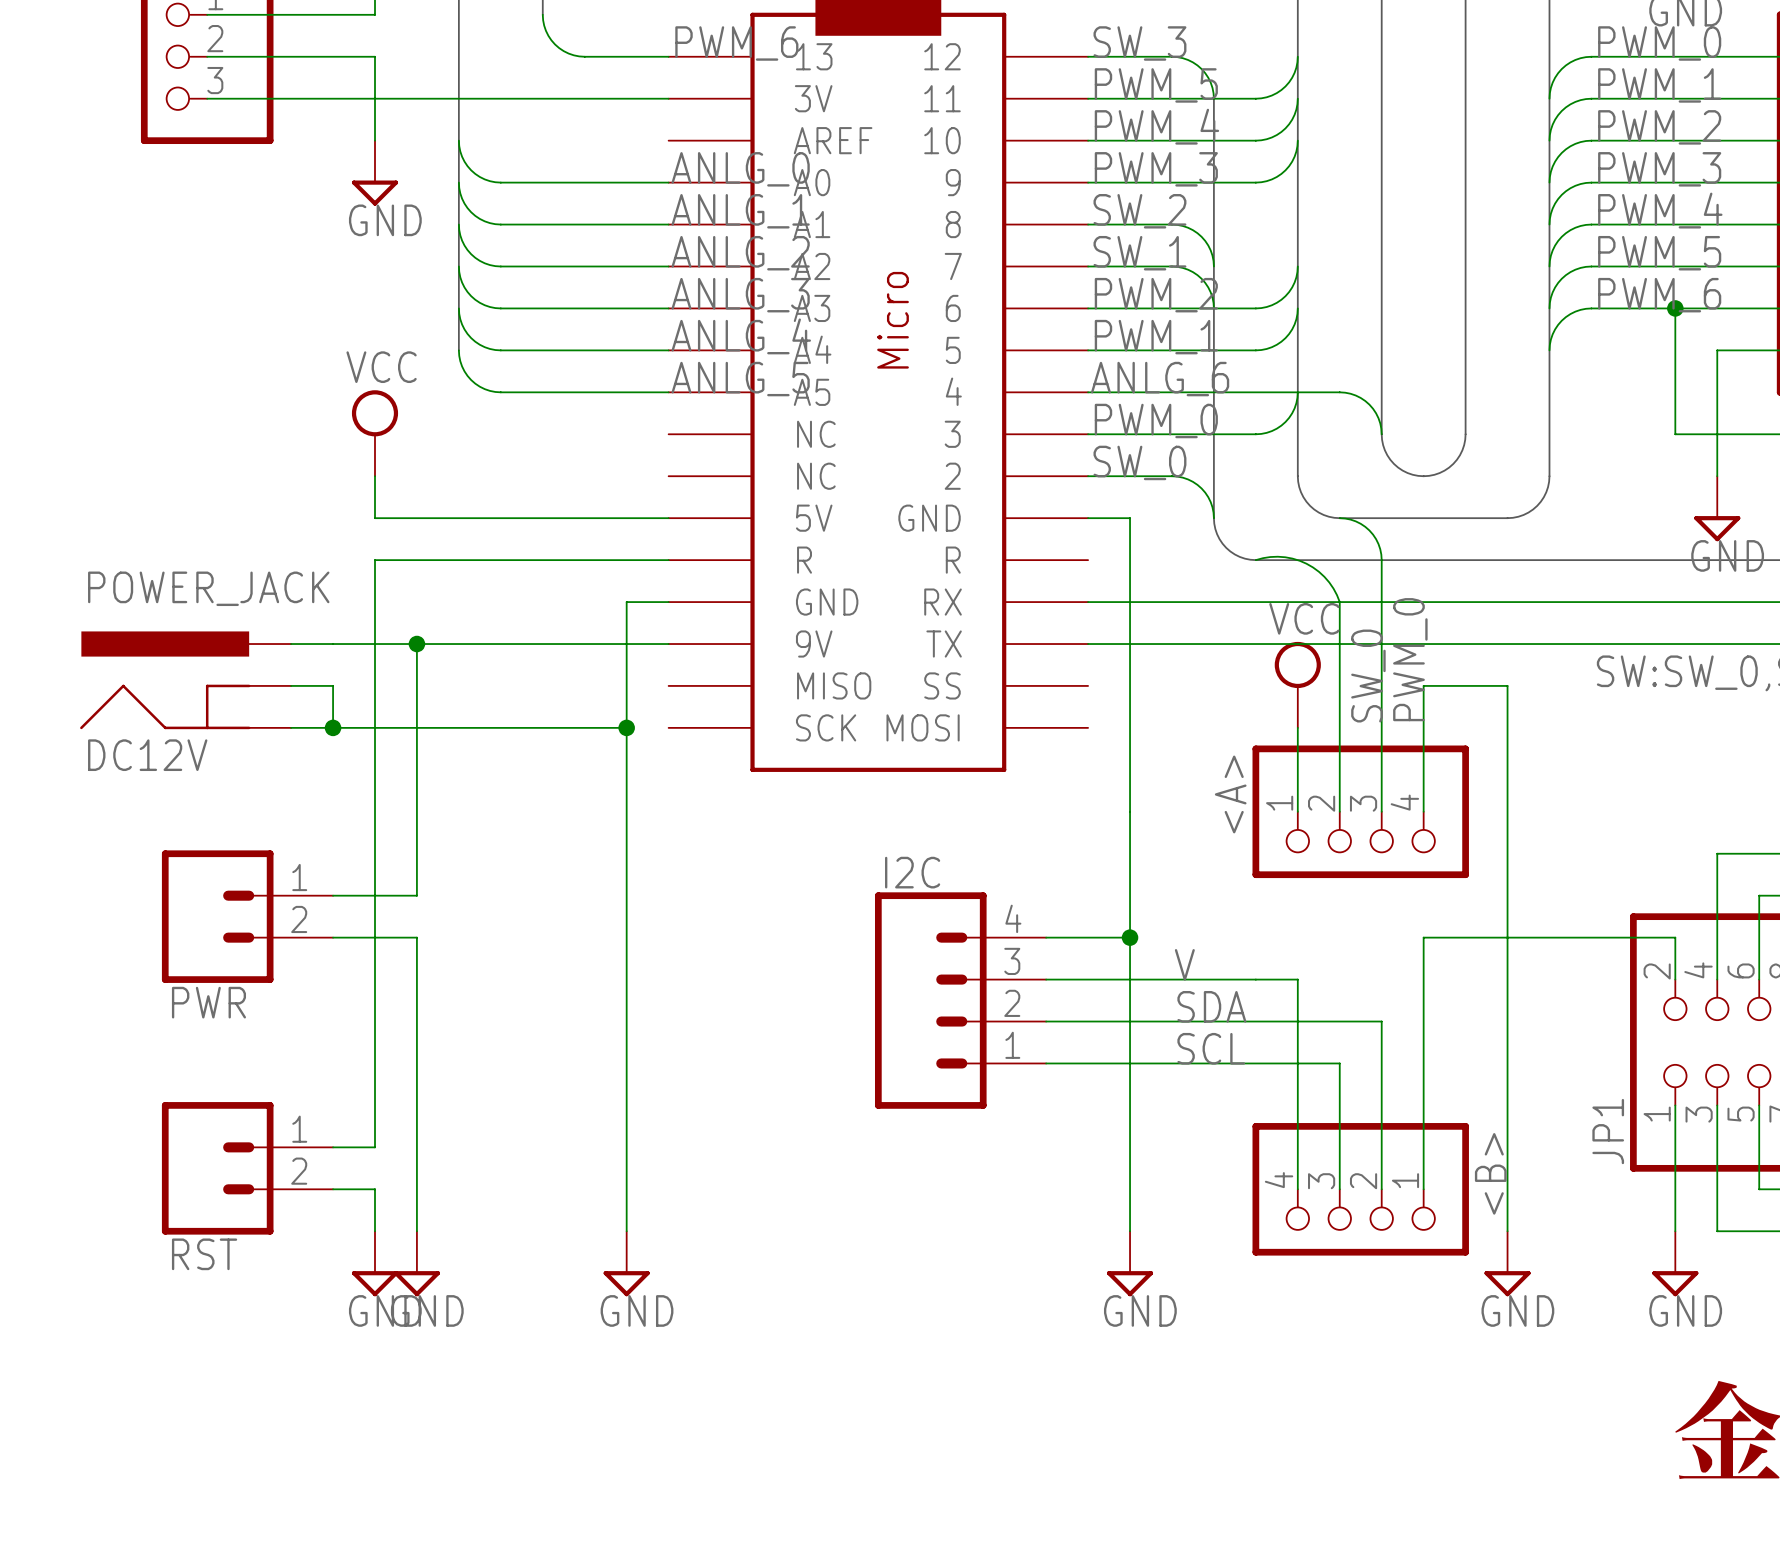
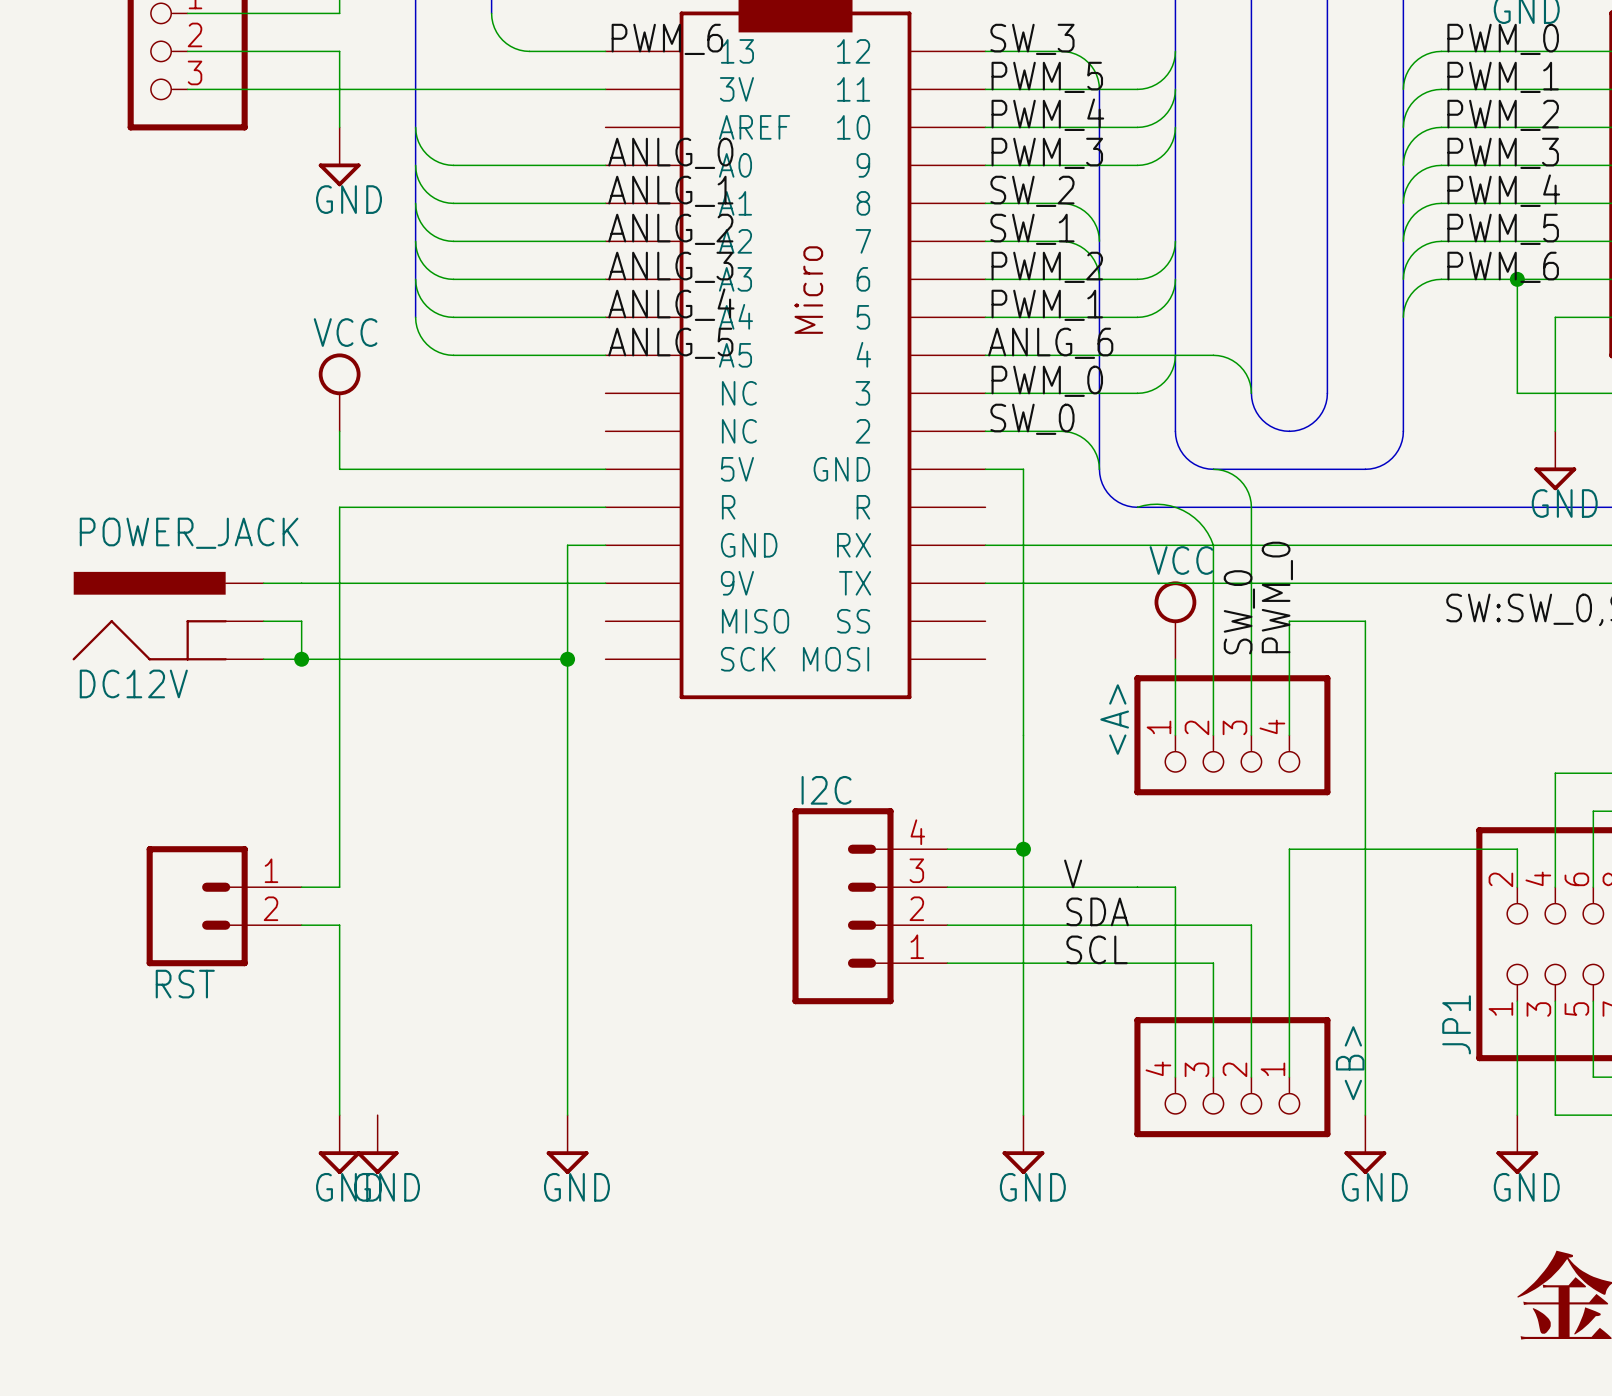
wire: (416, 644) (416, 895) (333, 895) -> none
junction: (416, 644) -> none
PWR: (247, 916) -> none
wire: (333, 937) (416, 937) (416, 1231) -> none
wire: (374, 979) (374, 1021) -> (339, 887) (301, 887)
wire: (333, 1147) (374, 1147) -> (339, 1077) (339, 1039)
RST position: (247, 1168) -> (224, 906)
wire: (333, 1189) (374, 1189) -> (301, 925) (339, 925)

